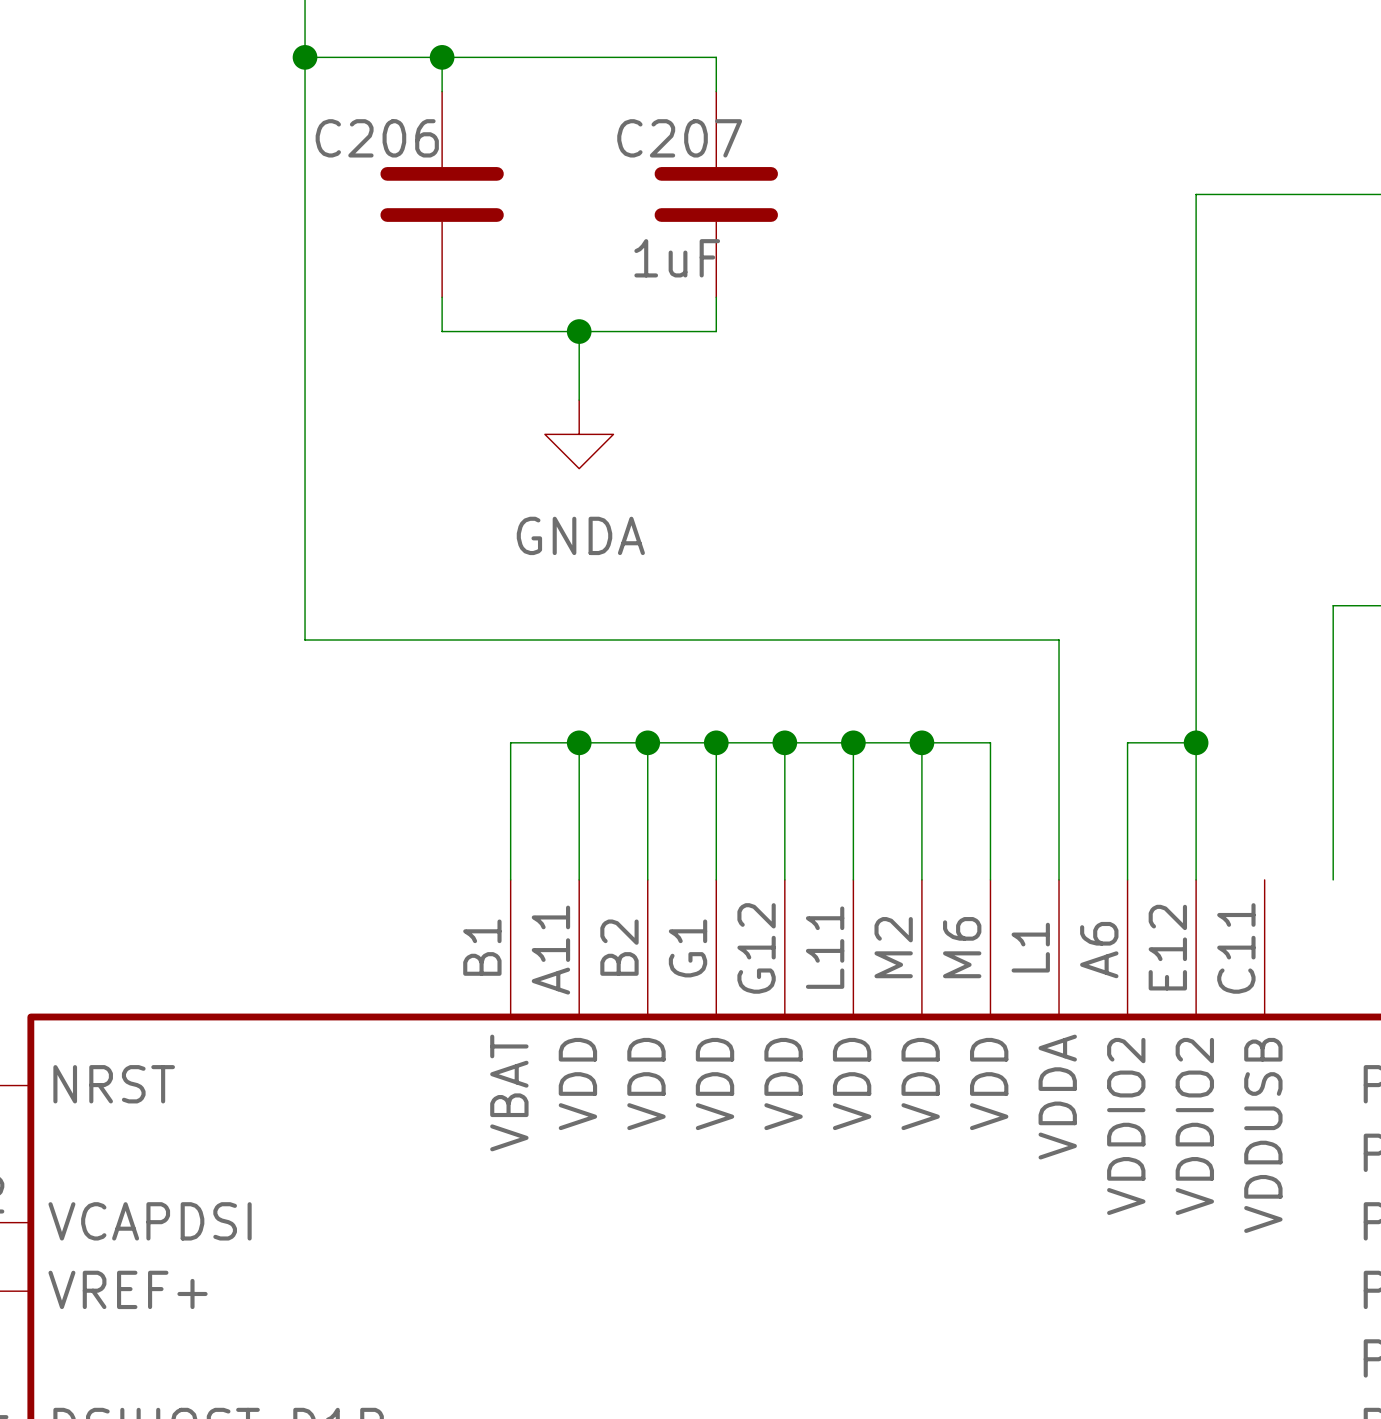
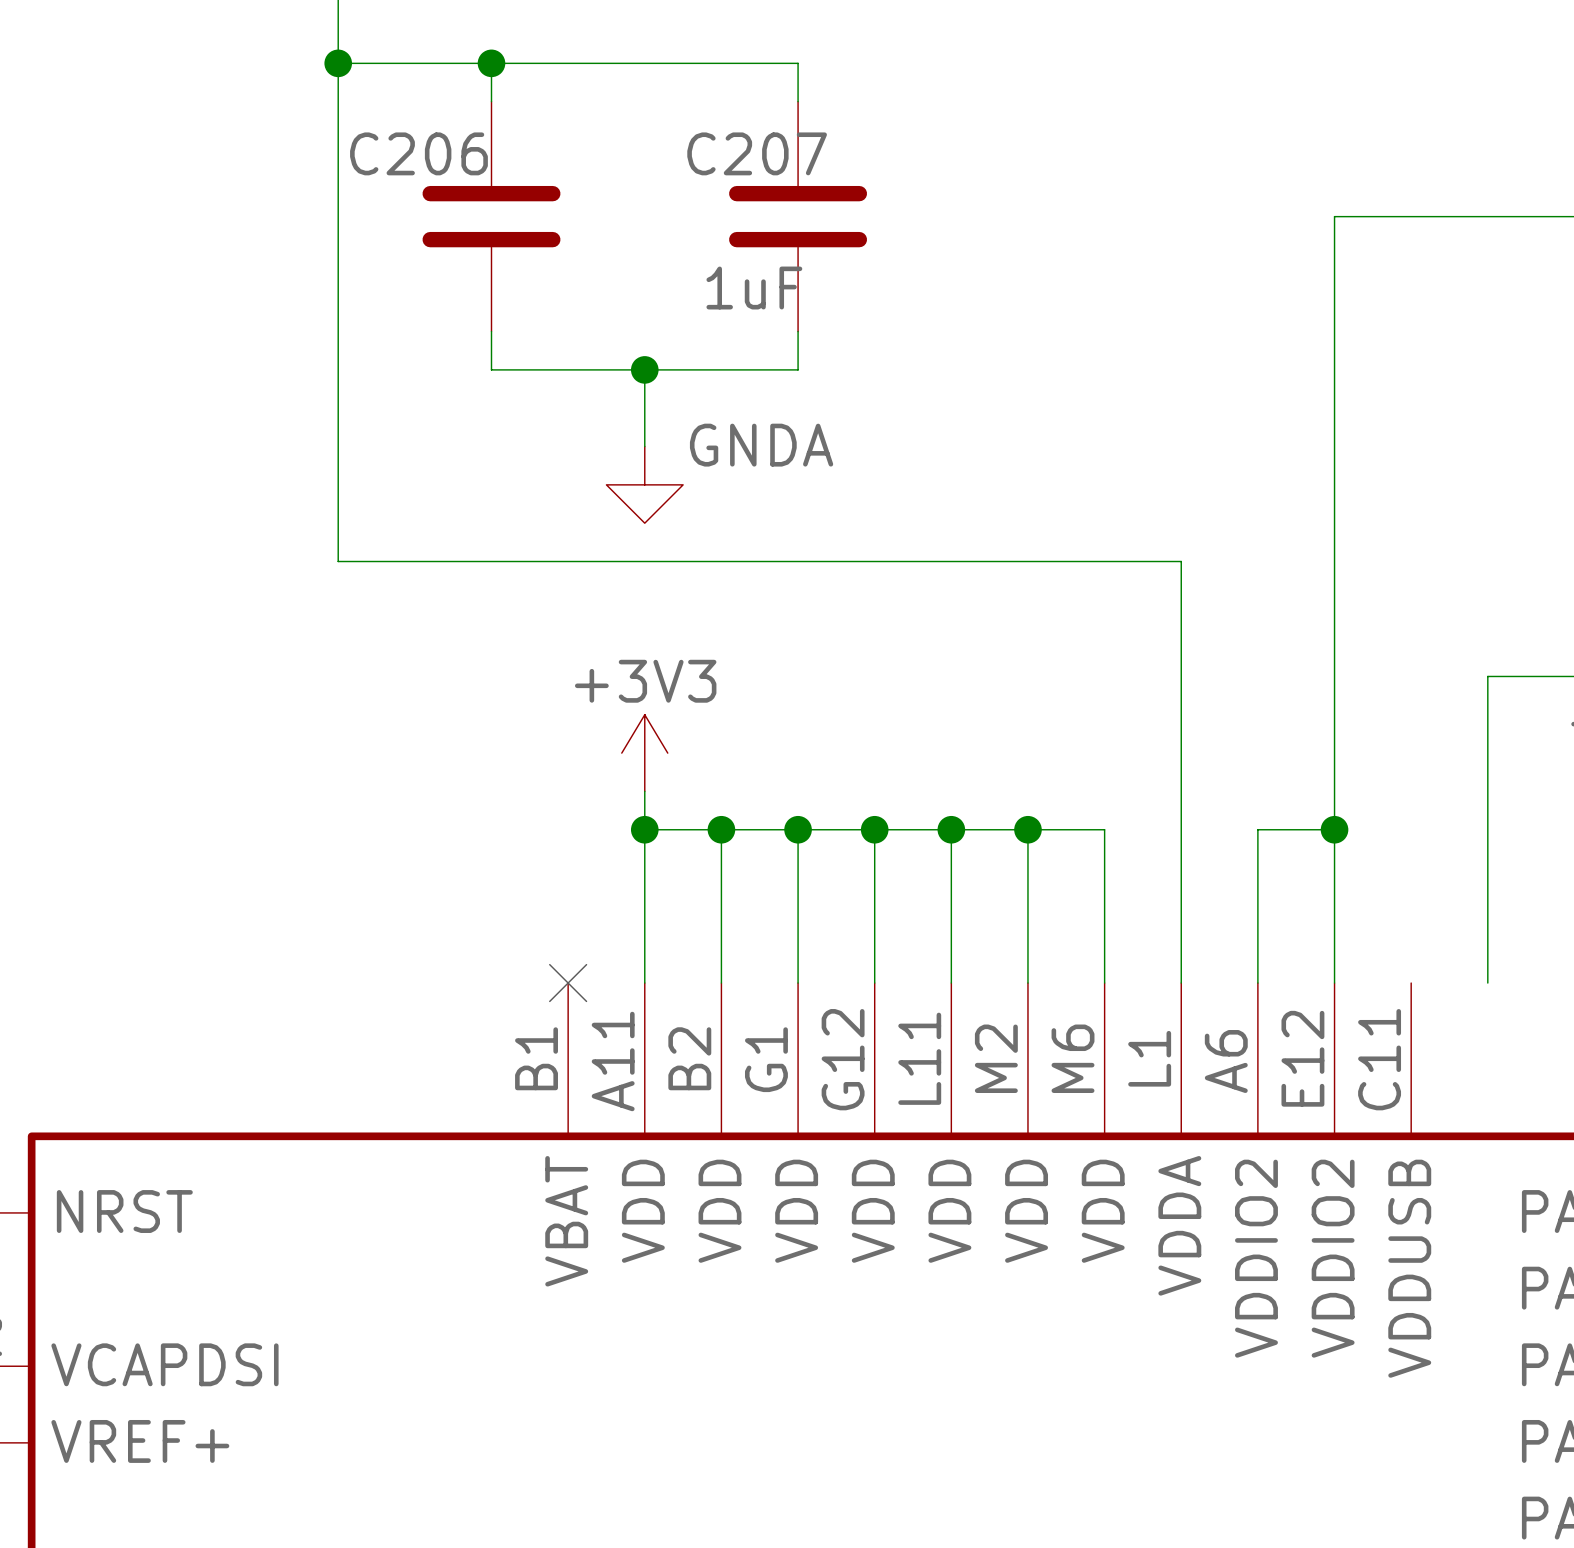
wire: (305, 502) (305, 640) (1059, 640) -> (338, 561) (1181, 561) (1181, 714)
power symbol text position: GNDA (580, 535) -> GNDA (761, 445)
power symbol: none -> +3V3 (644, 753)
wire: (579, 742) (510, 742) (510, 879) -> (644, 829) (644, 791)
no-connect mark: none -> (568, 983)

